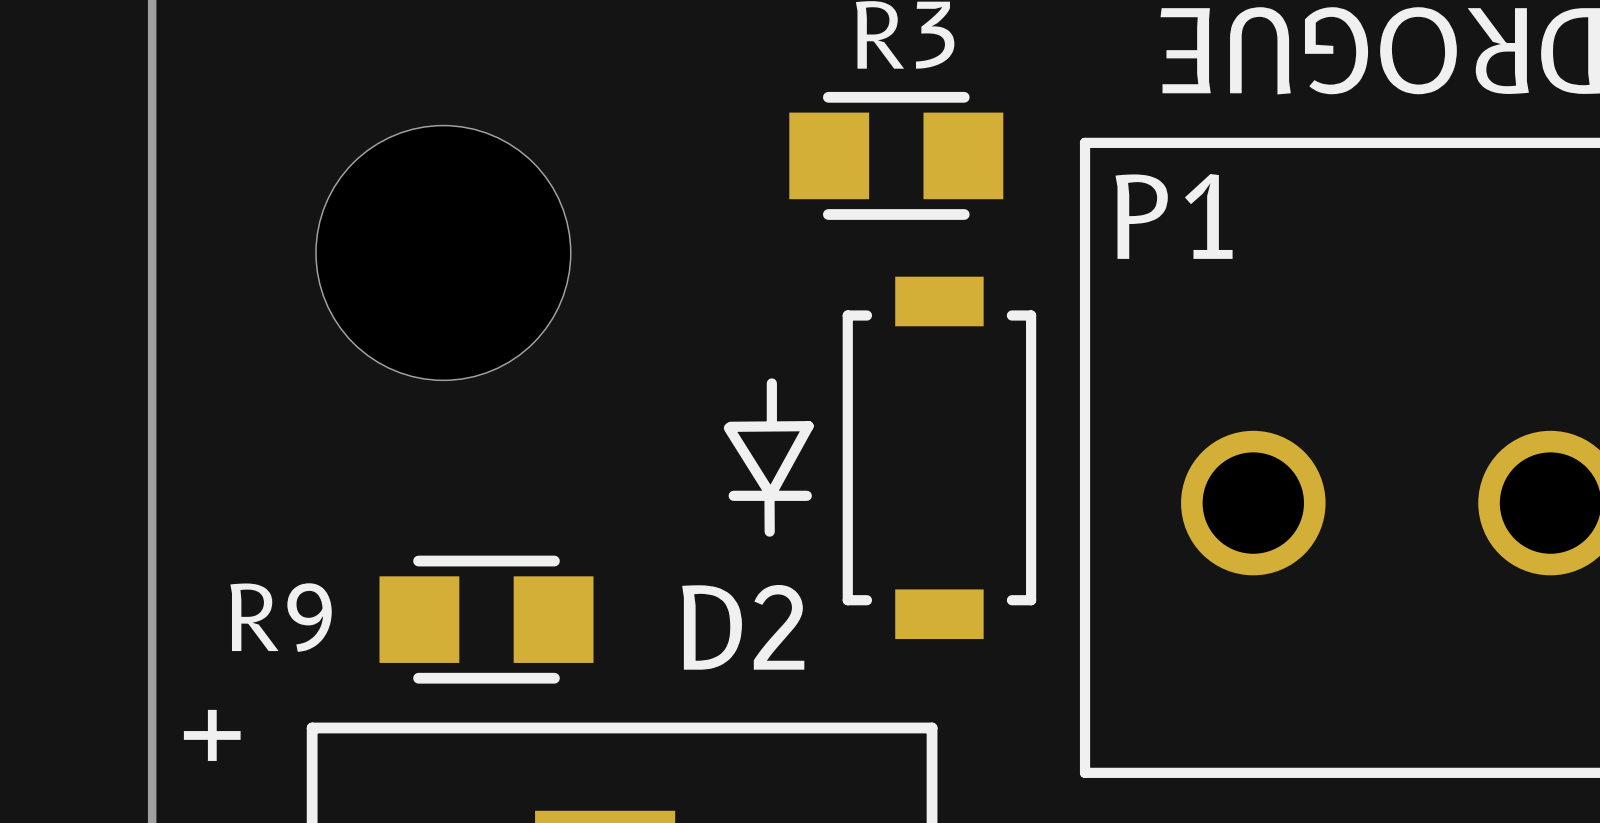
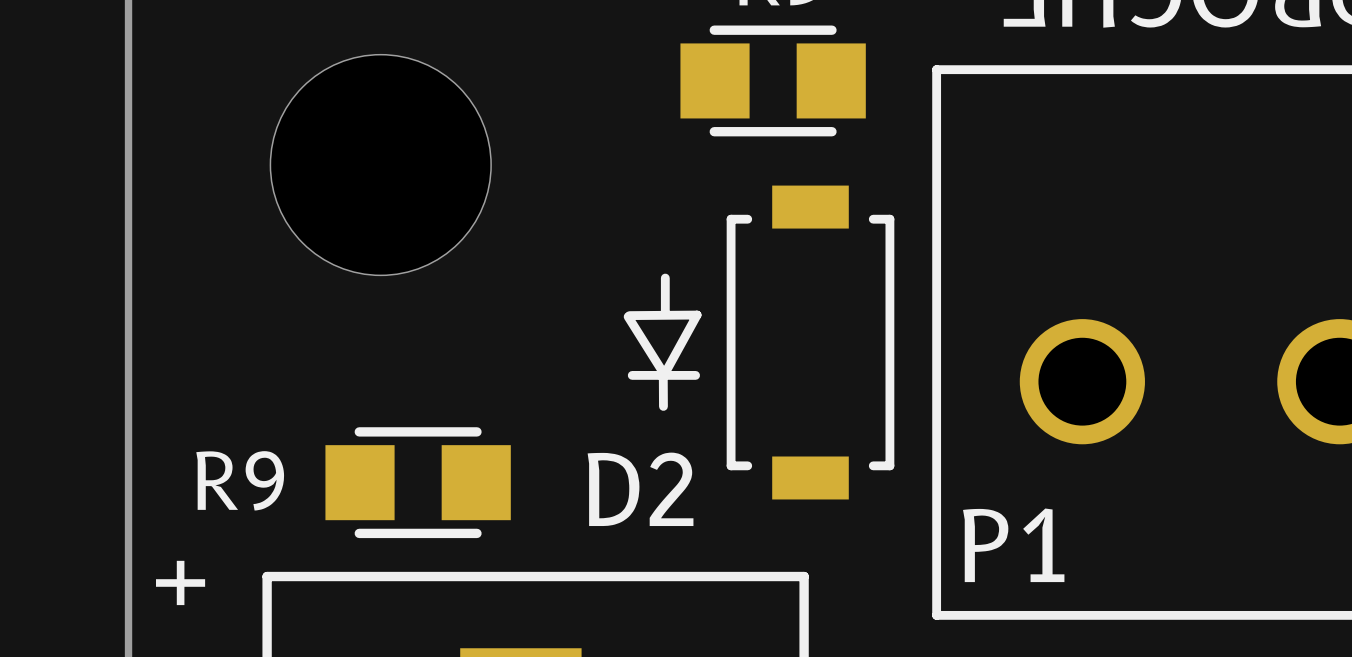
P1 name position: P1 (1174, 216) -> P1 (1013, 545)

